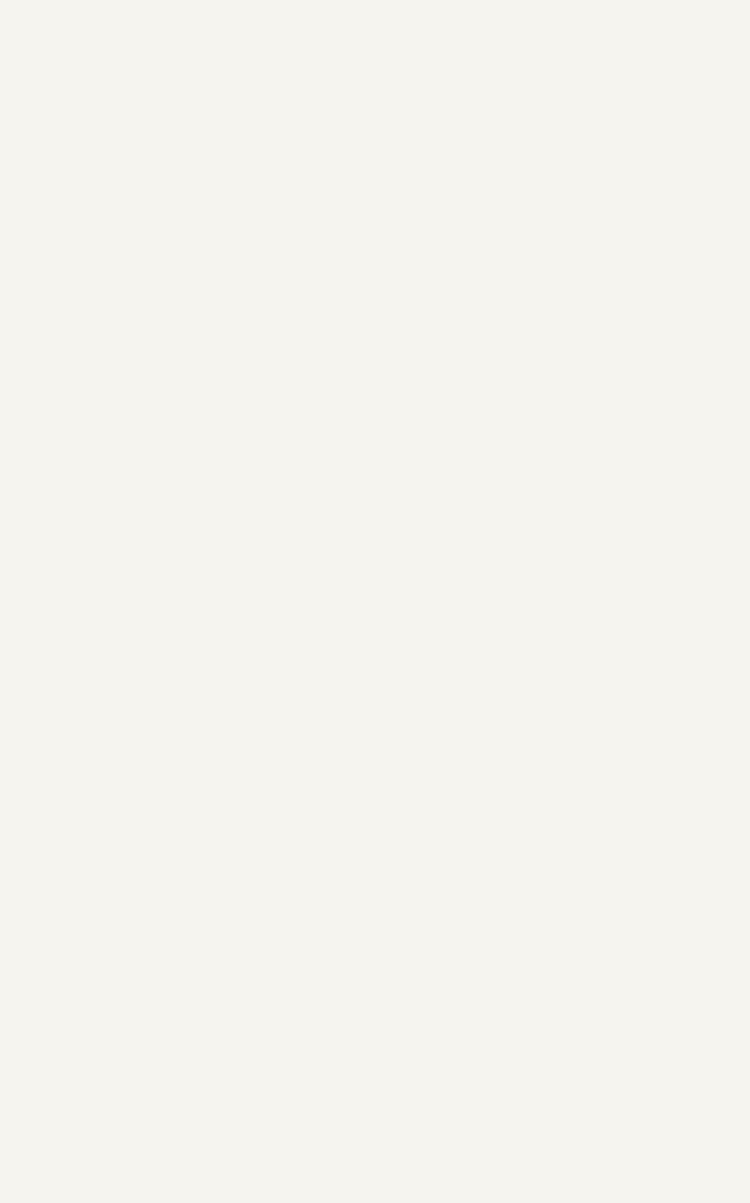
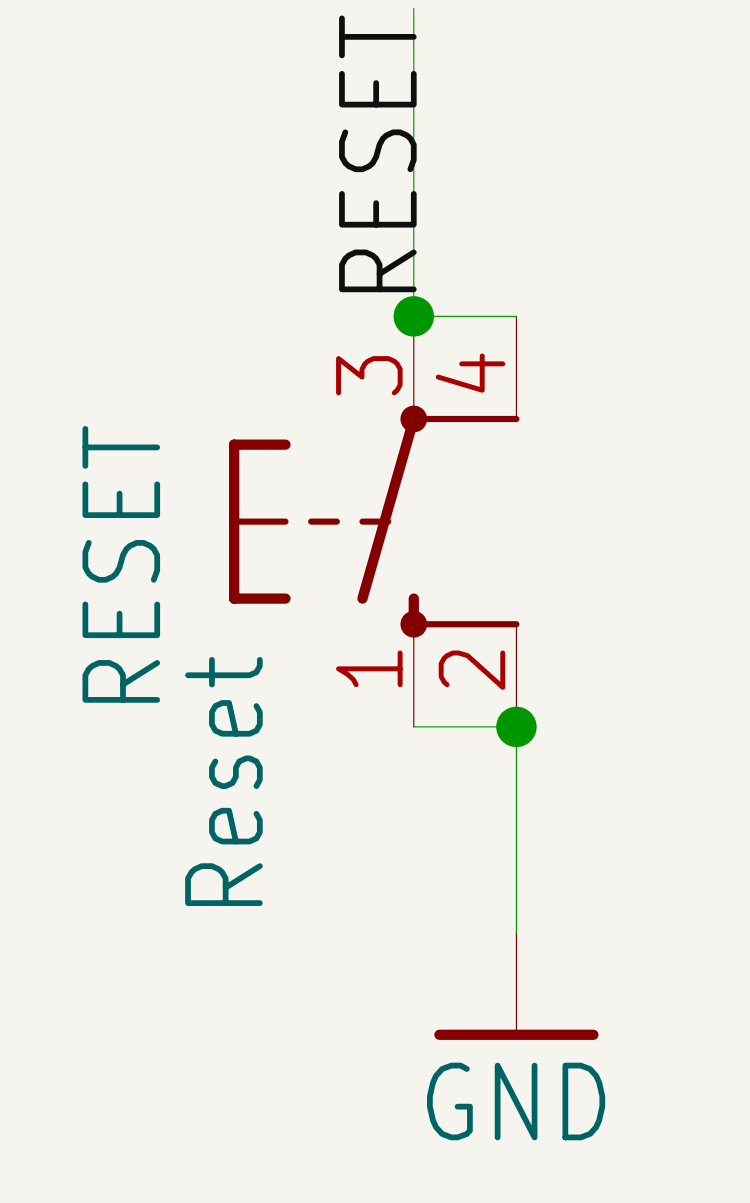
wire: none -> (413, 8) (413, 316) (516, 316)
label: none -> RESET (377, 153)
junction: none -> (413, 316)
RESET: none -> Reset (374, 521)
wire: none -> (413, 726) (516, 726) (516, 932)
junction: none -> (516, 726)
power symbol: none -> GND (516, 986)

